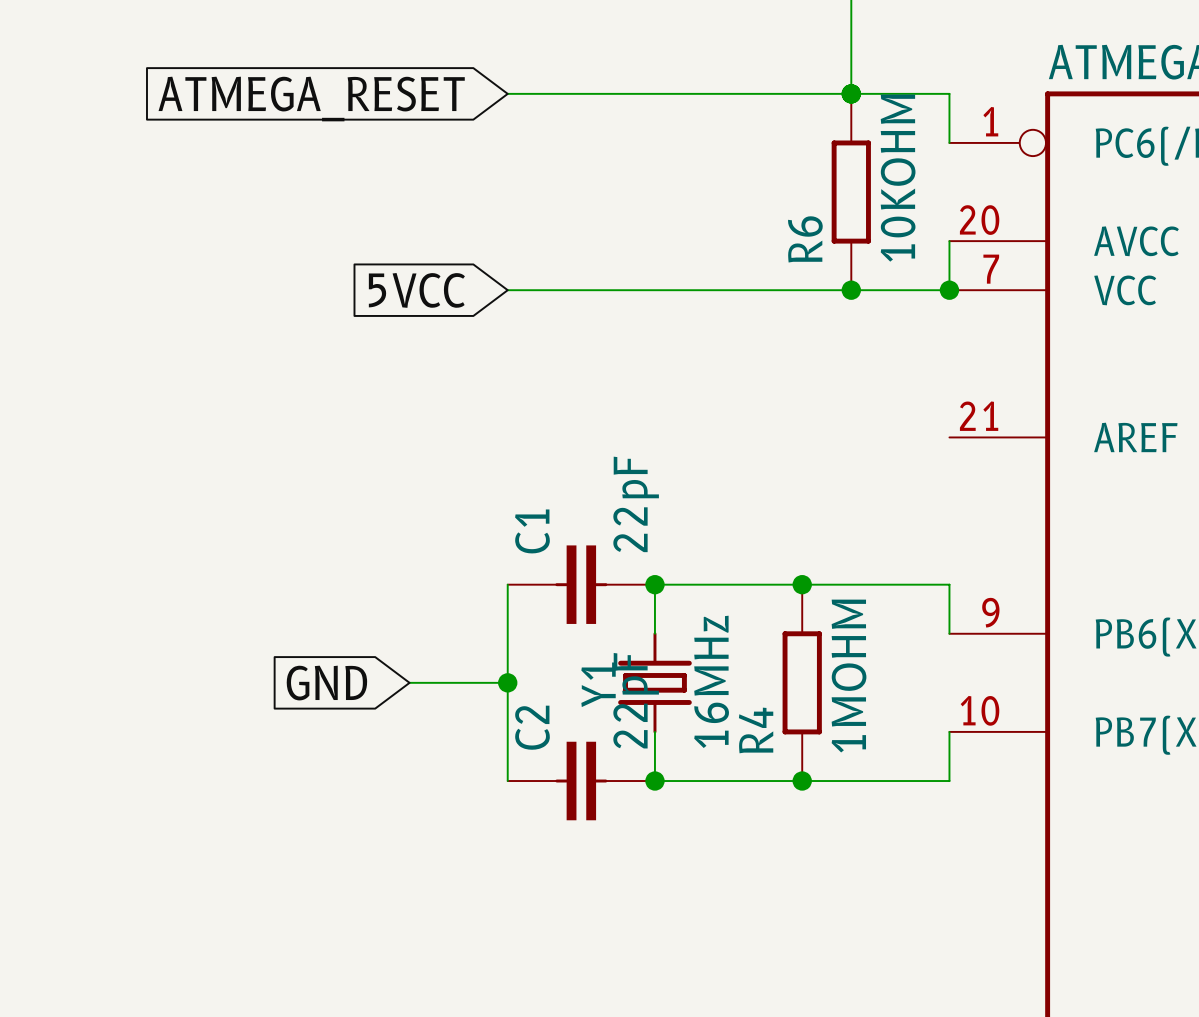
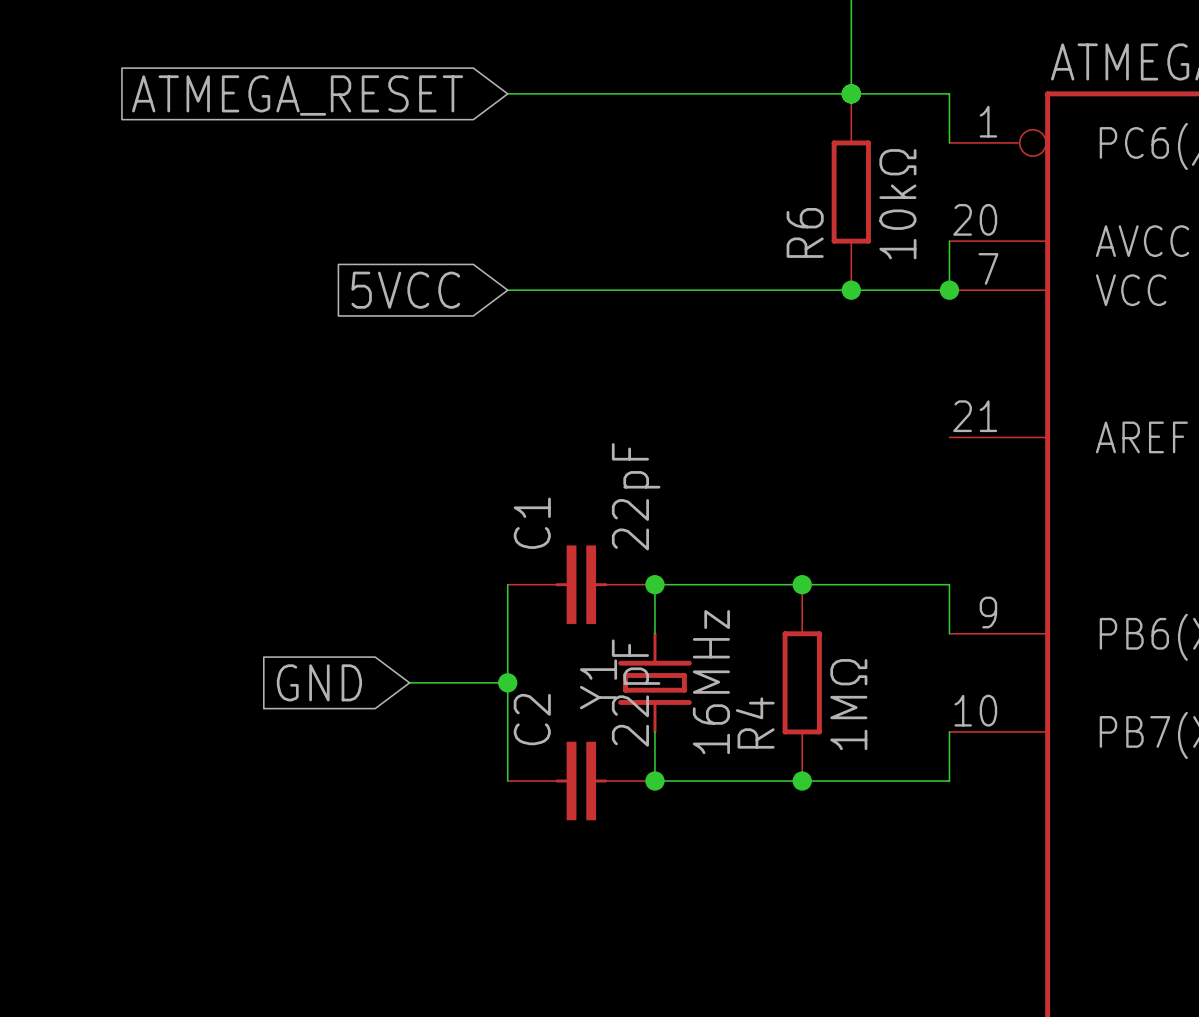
R6 value: 10KOHM (898, 178) -> 10kΩ (897, 204)
R4 value: 1MOHM (849, 676) -> 1MΩ (848, 704)

